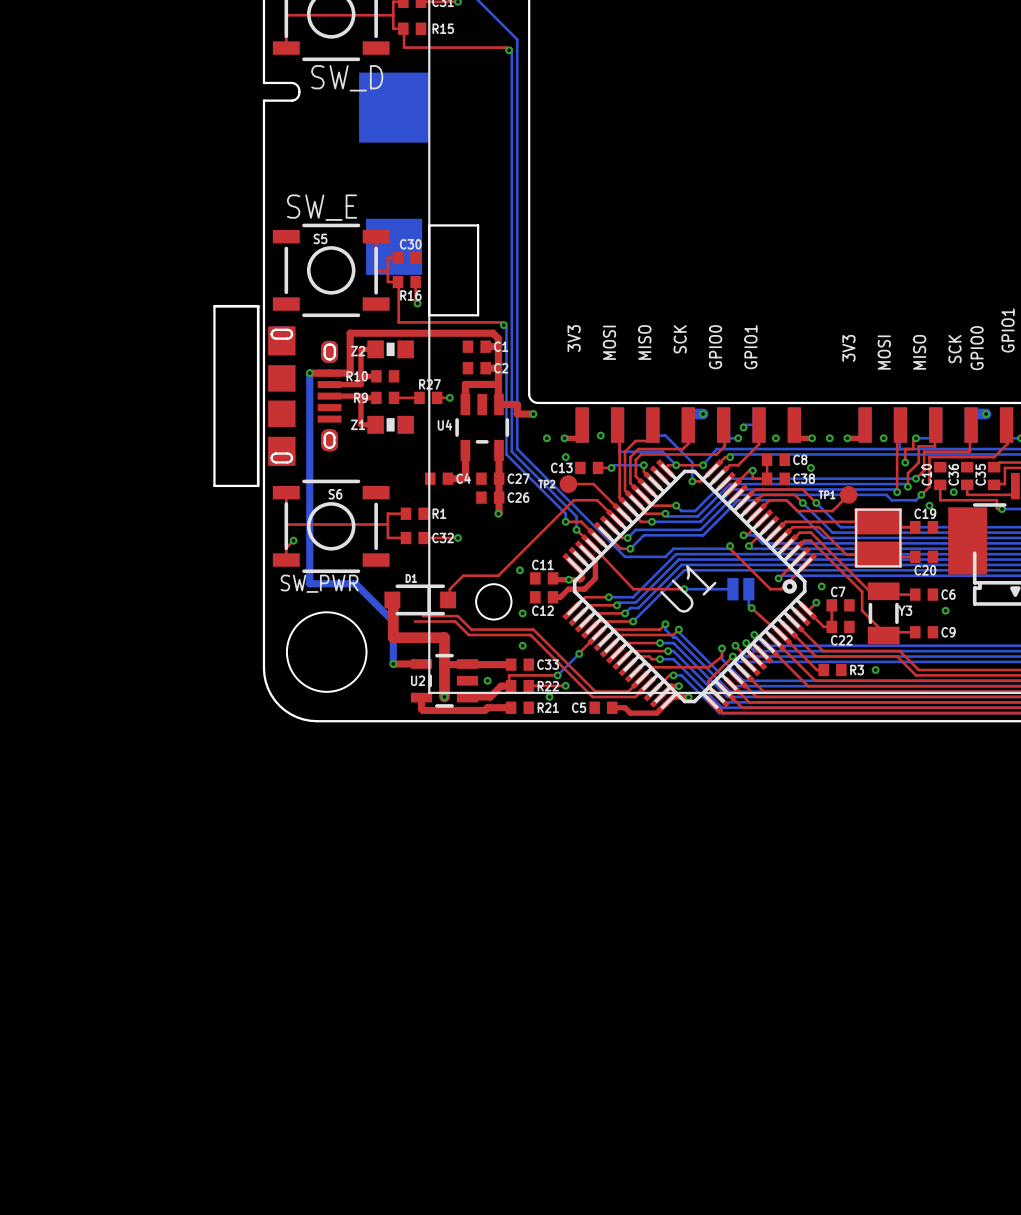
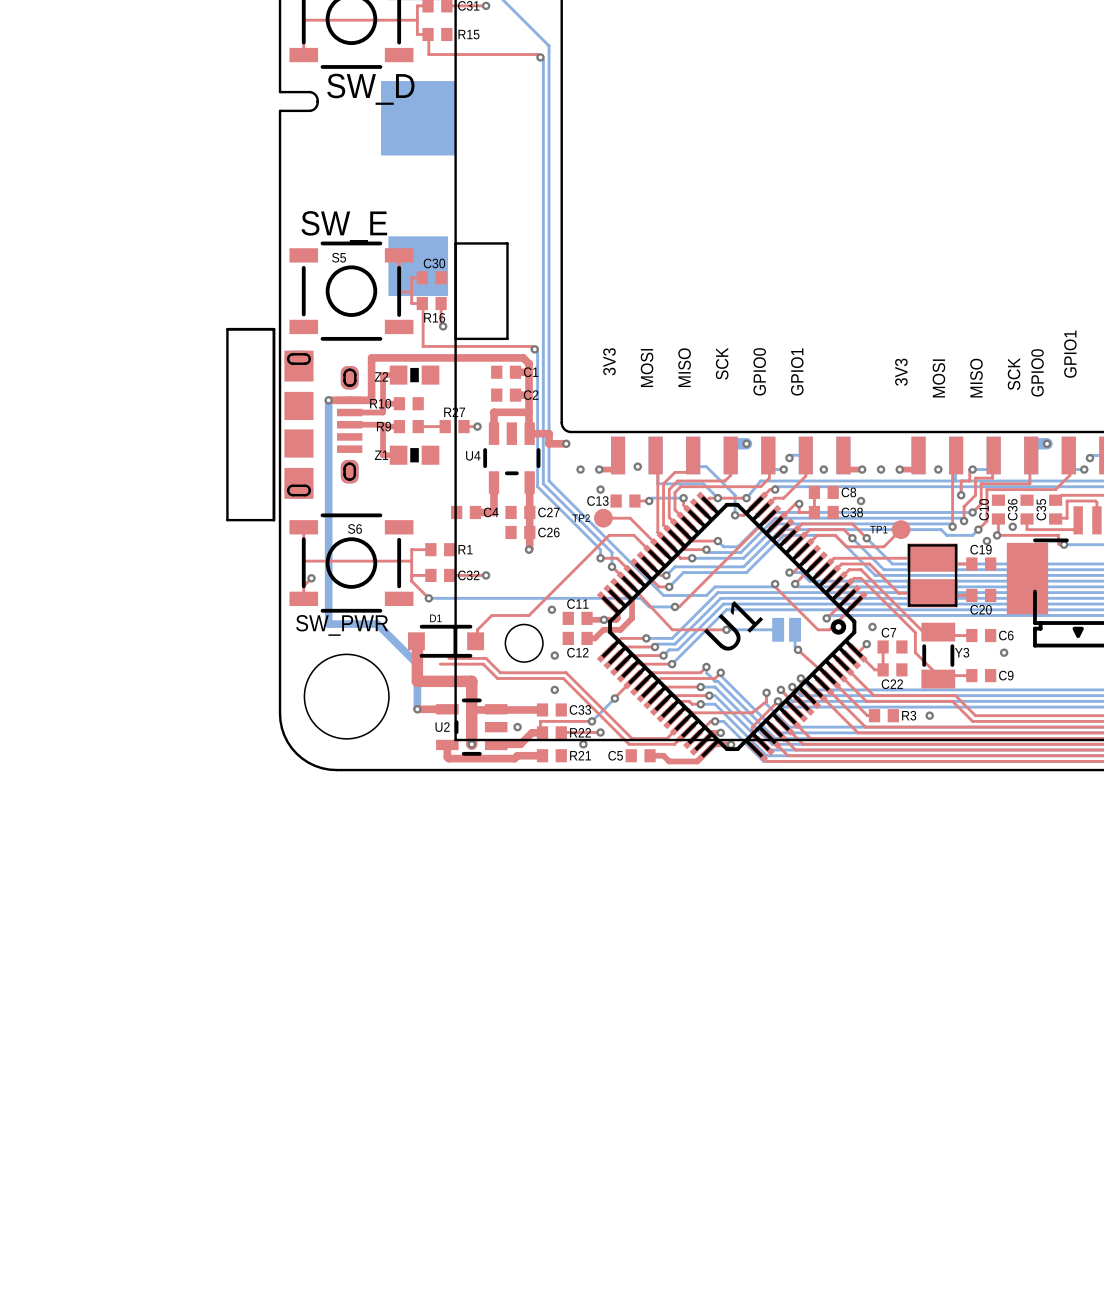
top track: none -> (771, 514) (679, 606) (674, 606)
via: none -> (997, 535)
top track: none -> (411, 575) (411, 581) (428, 598)
bottom track: none -> (428, 598) (640, 598) (649, 606) (674, 606)
via: none -> (428, 598)
via: none -> (674, 606)

